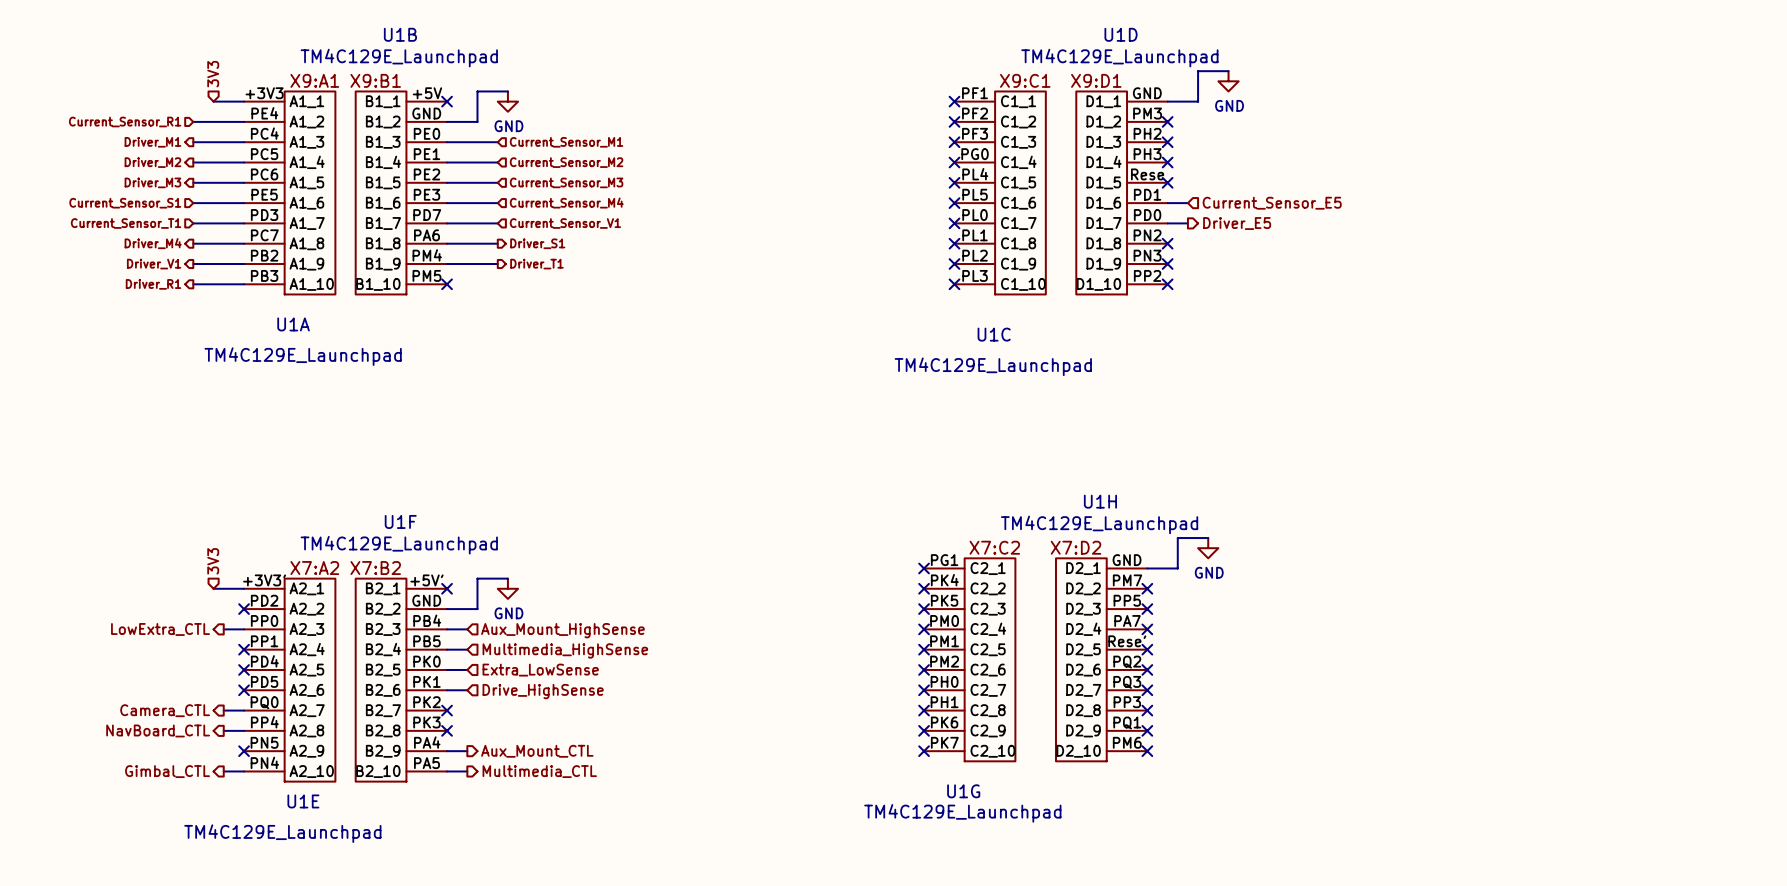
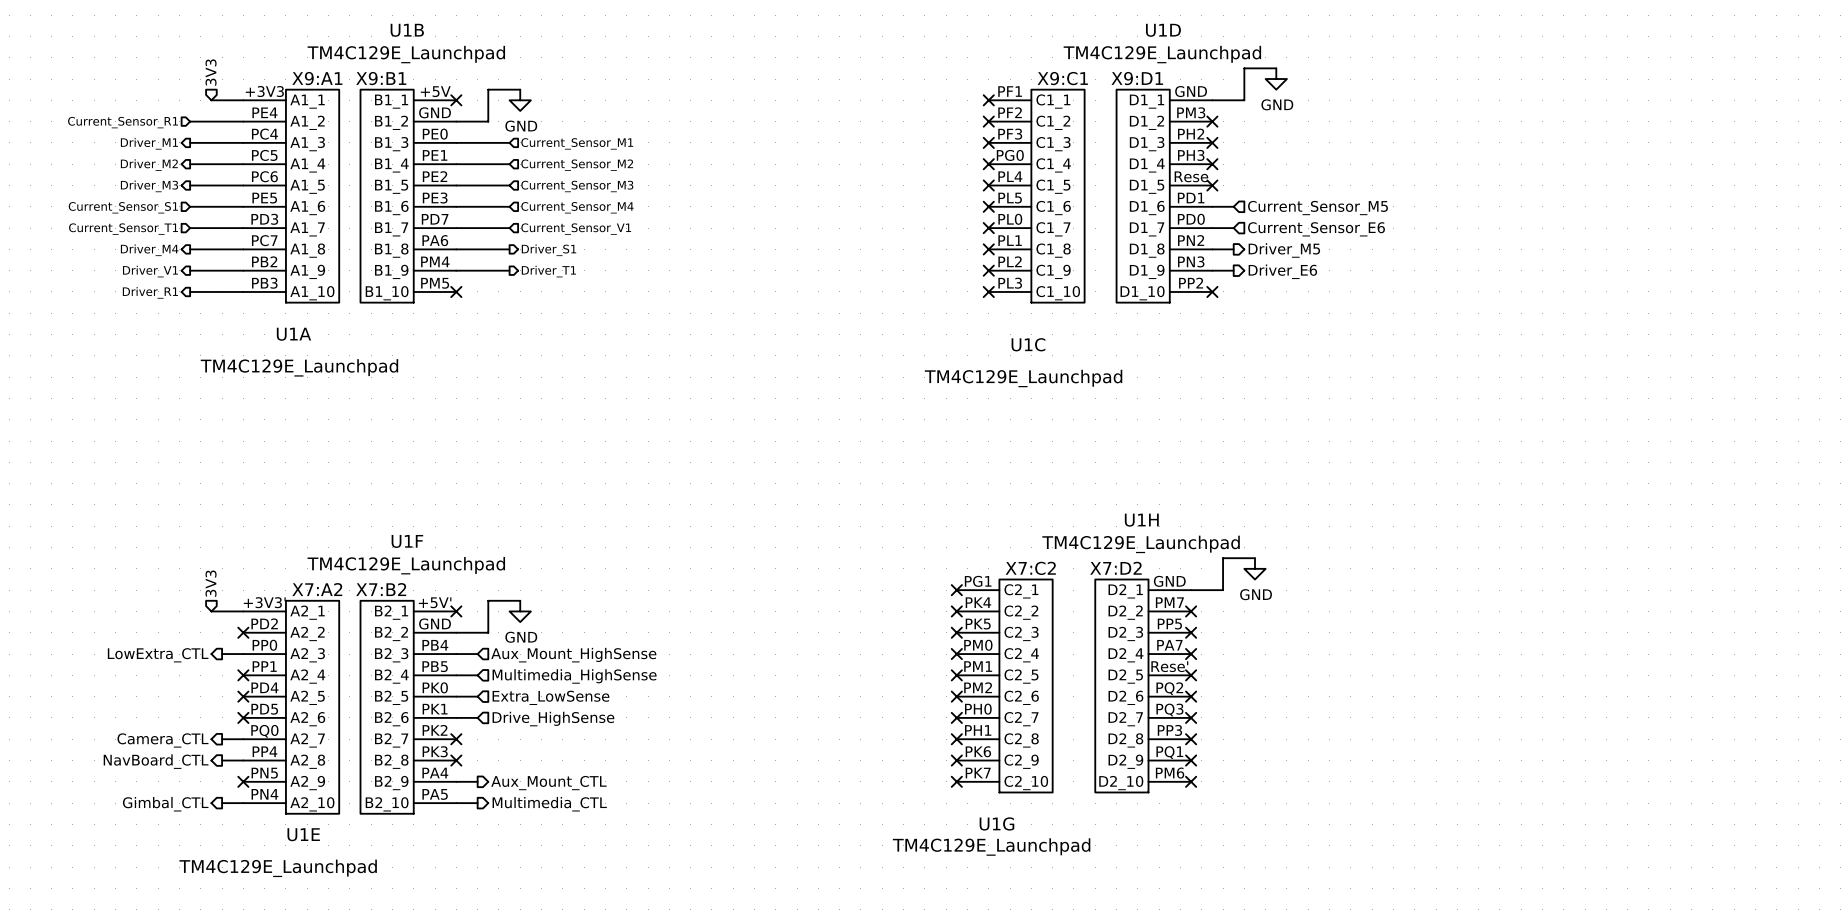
hierarchical label: Current_Sensor_E5 (1272, 203) -> Current_Sensor_M5 (1317, 208)
hierarchical label shape: output (1237, 223) -> input (1316, 229)
hierarchical label: Driver_E5 (1237, 223) -> Current_Sensor_E6 (1316, 229)
wire: none -> (1212, 249) (1233, 249)
no-connect mark: (1167, 243) -> none
hierarchical label: none -> Driver_M5 (1284, 250)
wire: none -> (1212, 270) (1233, 270)
no-connect mark: (1167, 264) -> none
hierarchical label: none -> Driver_E6 (1282, 271)

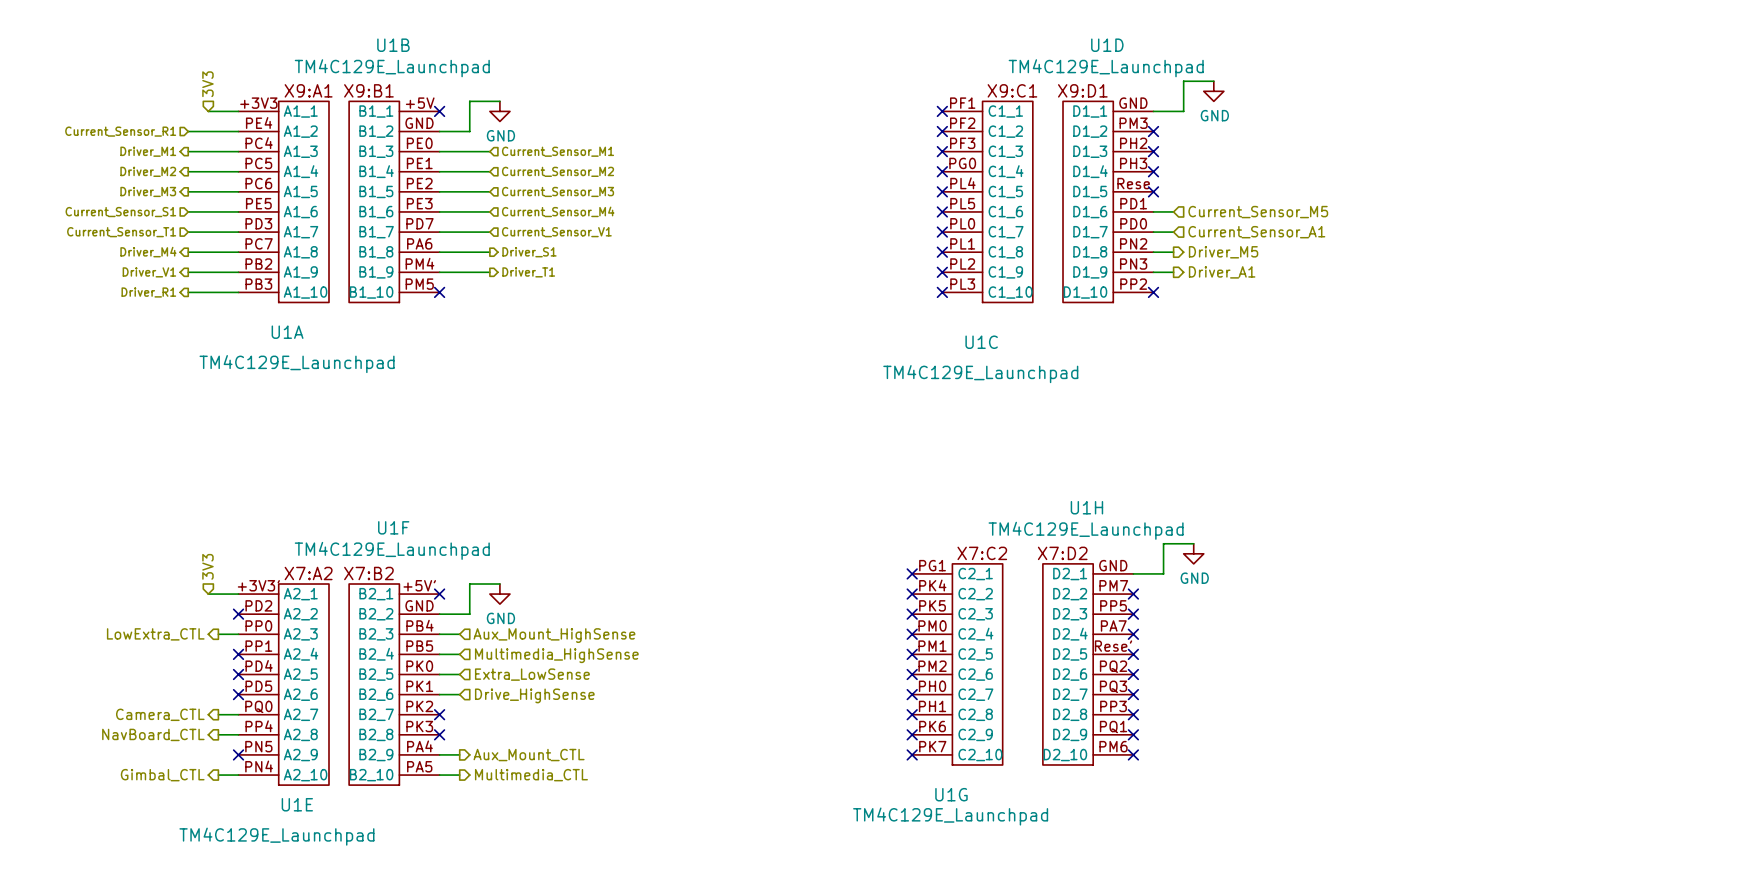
hierarchical label: Current_Sensor_E6 (1316, 229) -> Current_Sensor_A1 (1256, 232)
hierarchical label: Driver_E6 (1282, 271) -> Driver_A1 (1222, 272)

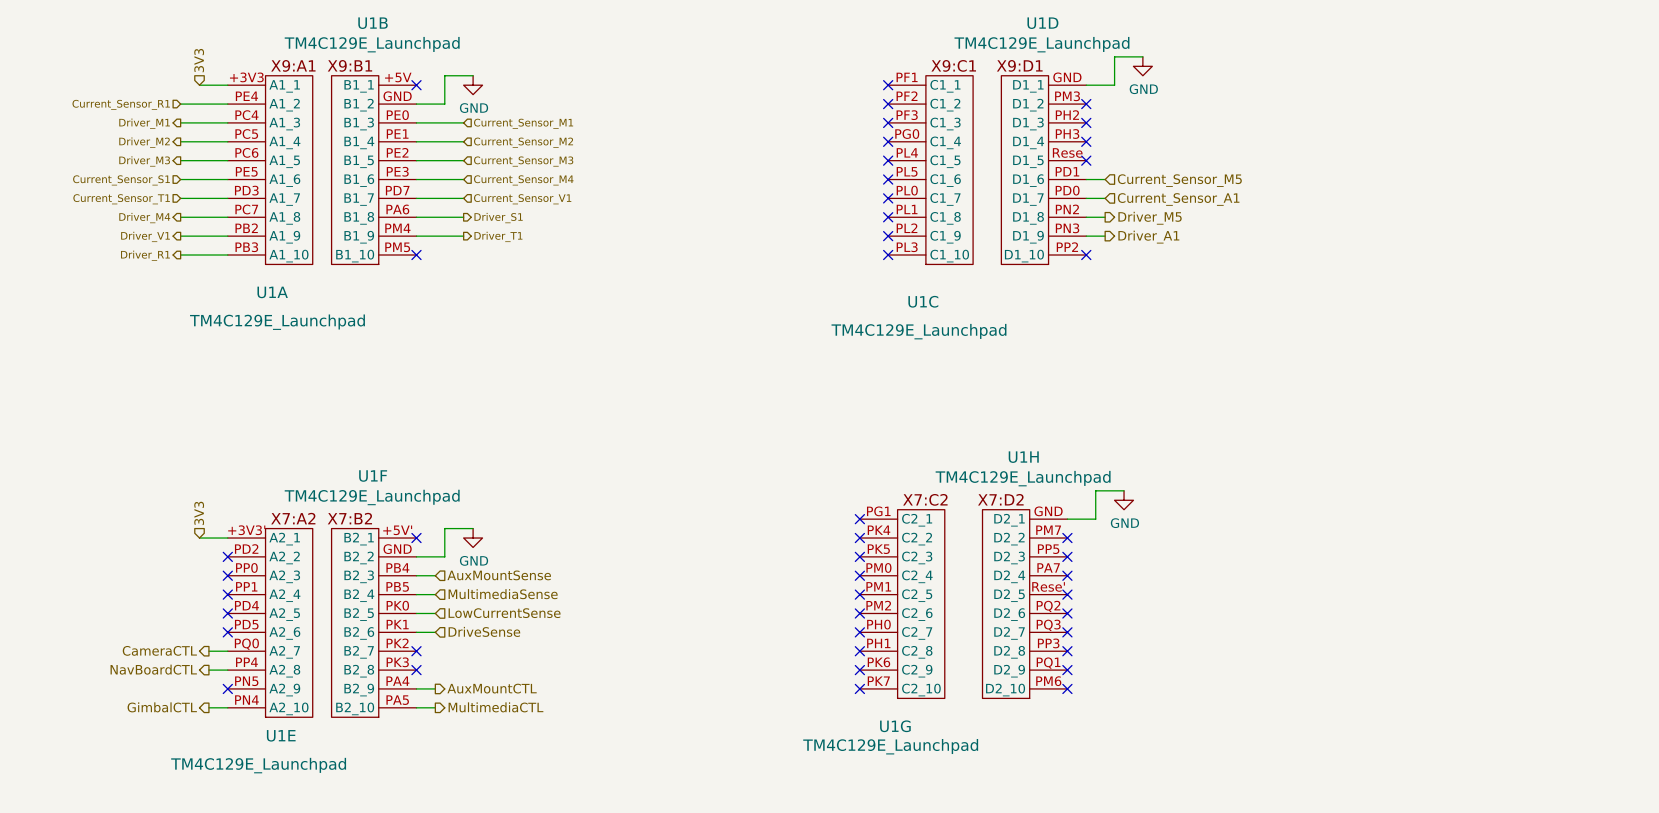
hierarchical label: LowExtra_CTL (155, 634) -> none
wire: (218, 634) (238, 634) -> none
no-connect mark: none -> (227, 575)
hierarchical label: Aux_Mount_HighSense (554, 635) -> AuxMountSense (499, 575)
hierarchical label: Multimedia_HighSense (556, 655) -> MultimediaSense (503, 594)
hierarchical label: Extra_LowSense (532, 674) -> LowCurrentSense (504, 613)
hierarchical label: Drive_HighSense (534, 695) -> DriveSense (484, 631)
hierarchical label: Camera_CTL (160, 714) -> CameraCTL (159, 650)
hierarchical label: NavBoard_CTL (153, 734) -> NavBoardCTL (153, 669)
hierarchical label: Aux_Mount_CTL (529, 755) -> AuxMountCTL (492, 688)
hierarchical label: Gimbal_CTL (162, 775) -> GimbalCTL (162, 707)
hierarchical label: Multimedia_CTL (531, 775) -> MultimediaCTL (495, 707)

